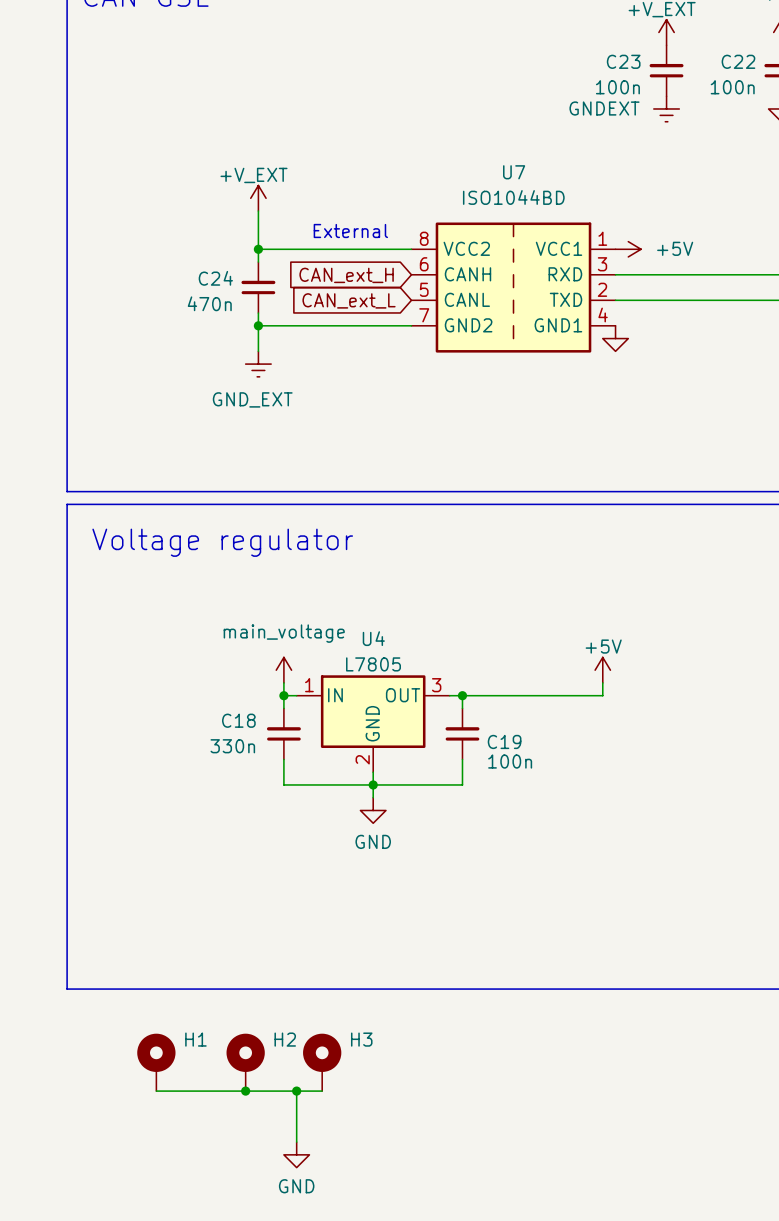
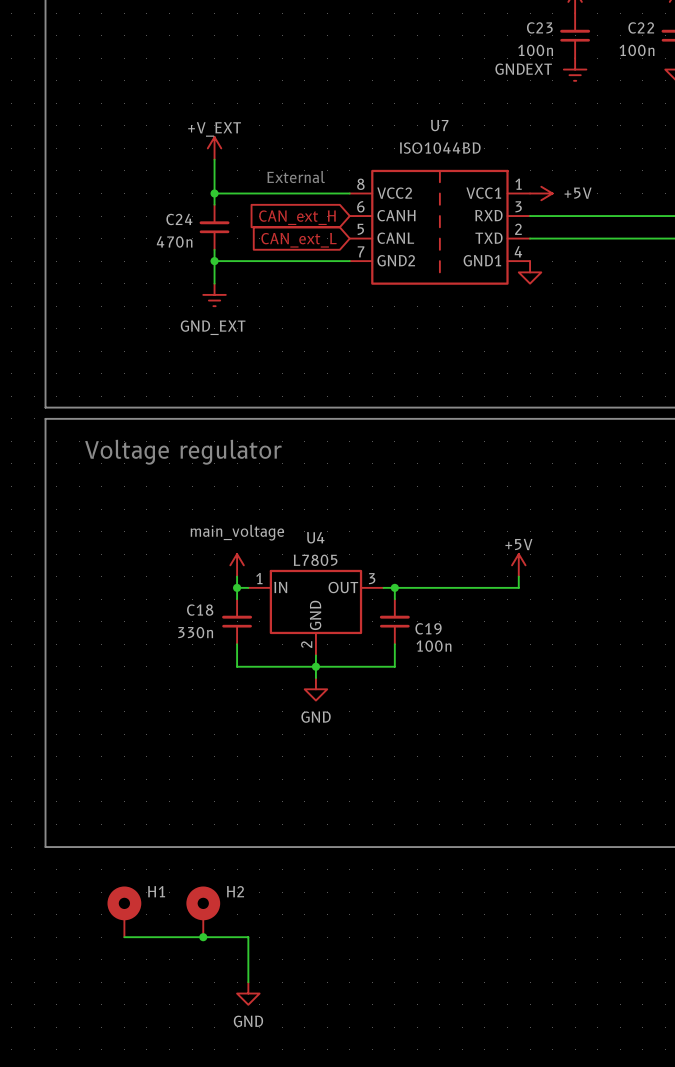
H3: (322, 1062) -> none
wire: (296, 1091) (322, 1091) -> none
junction: (296, 1091) -> none

